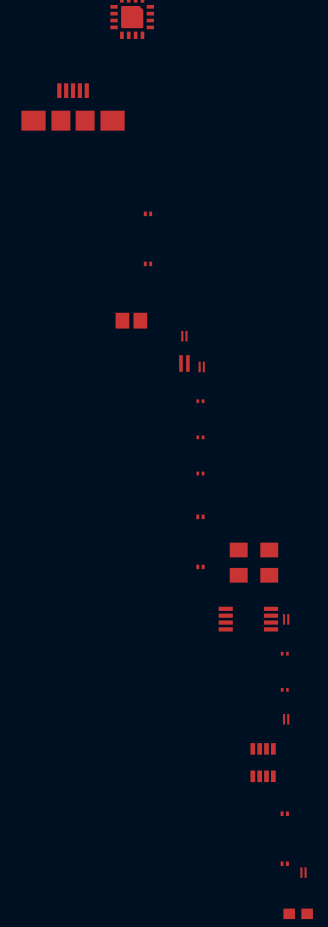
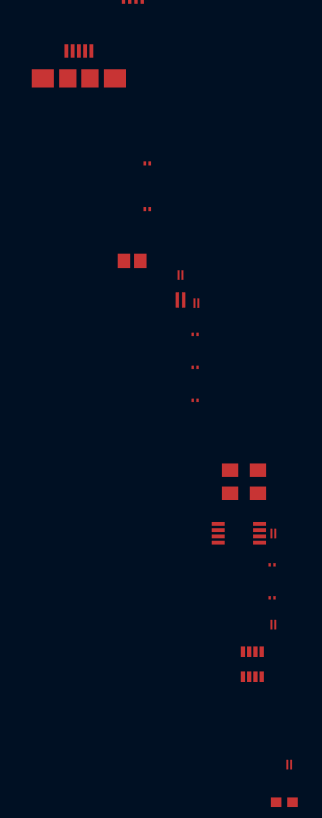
part: (200, 516) -> none
part: (200, 566) -> none
part: (284, 813) -> none
part: (284, 863) -> none

